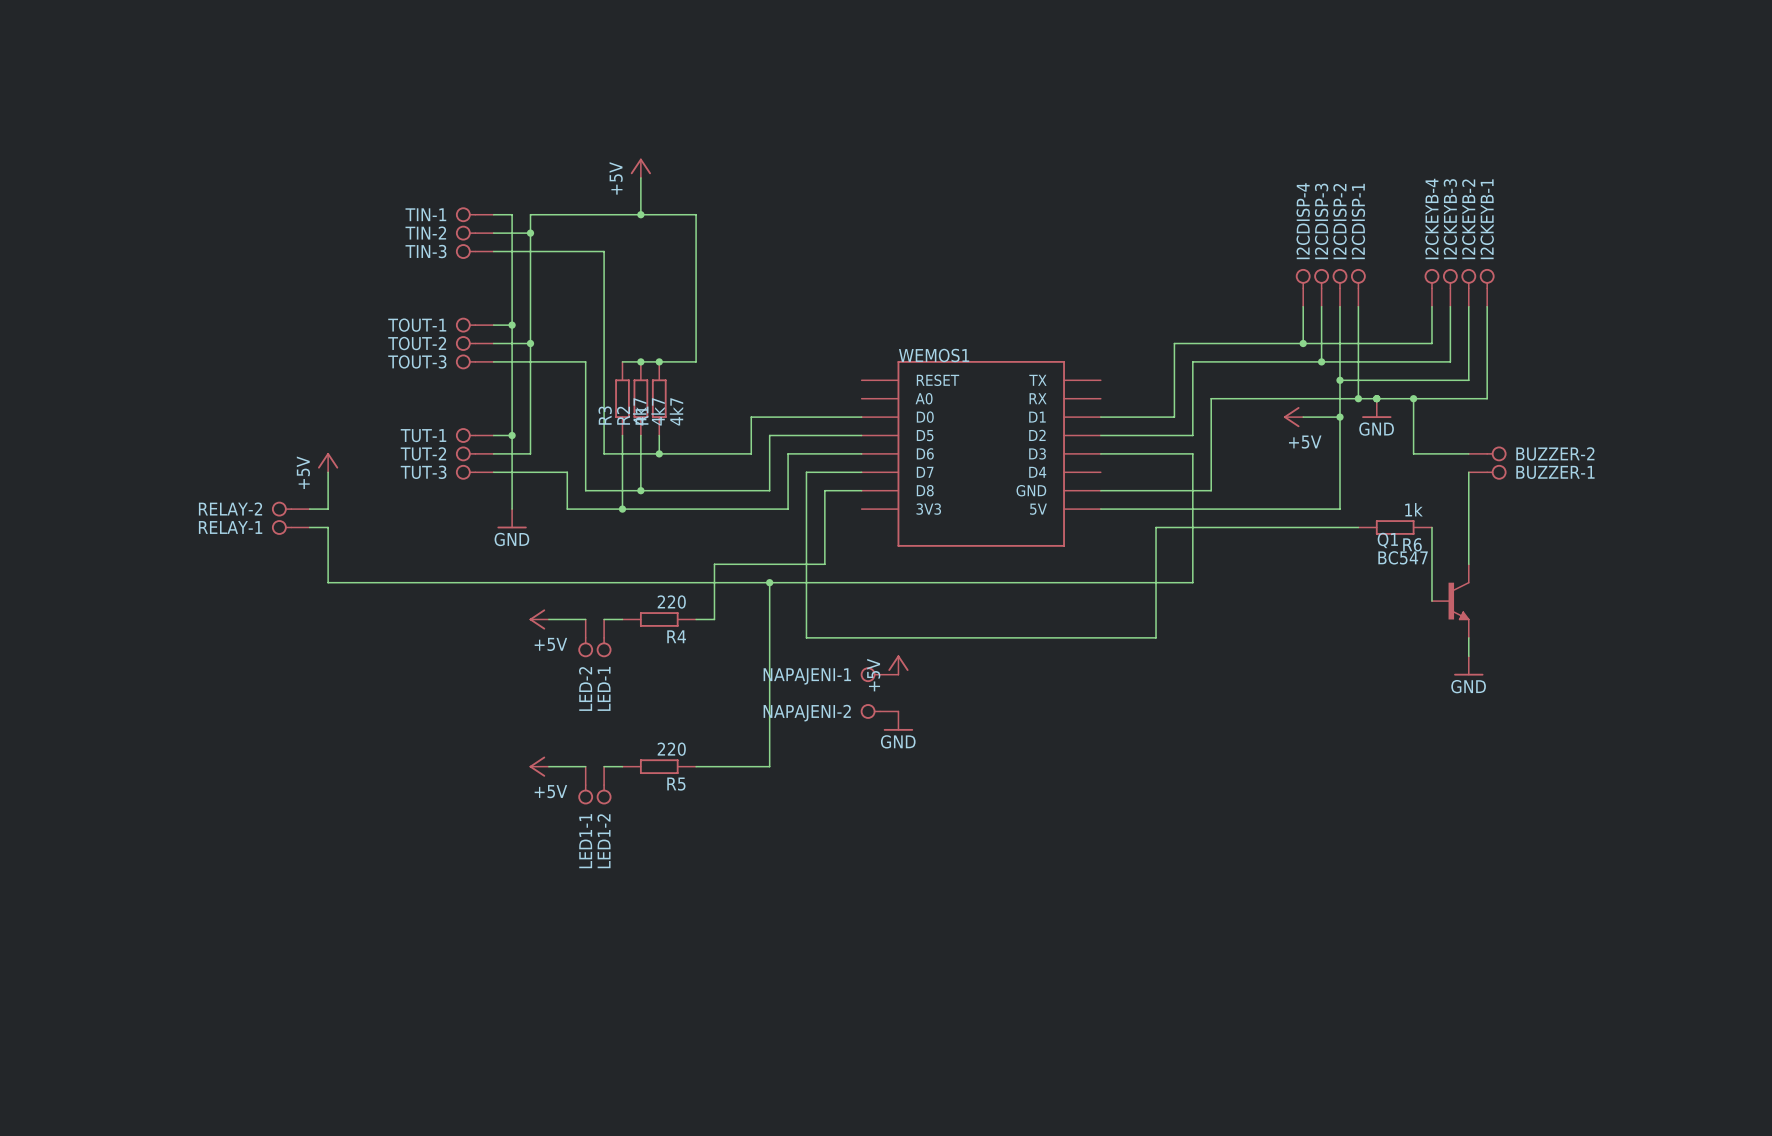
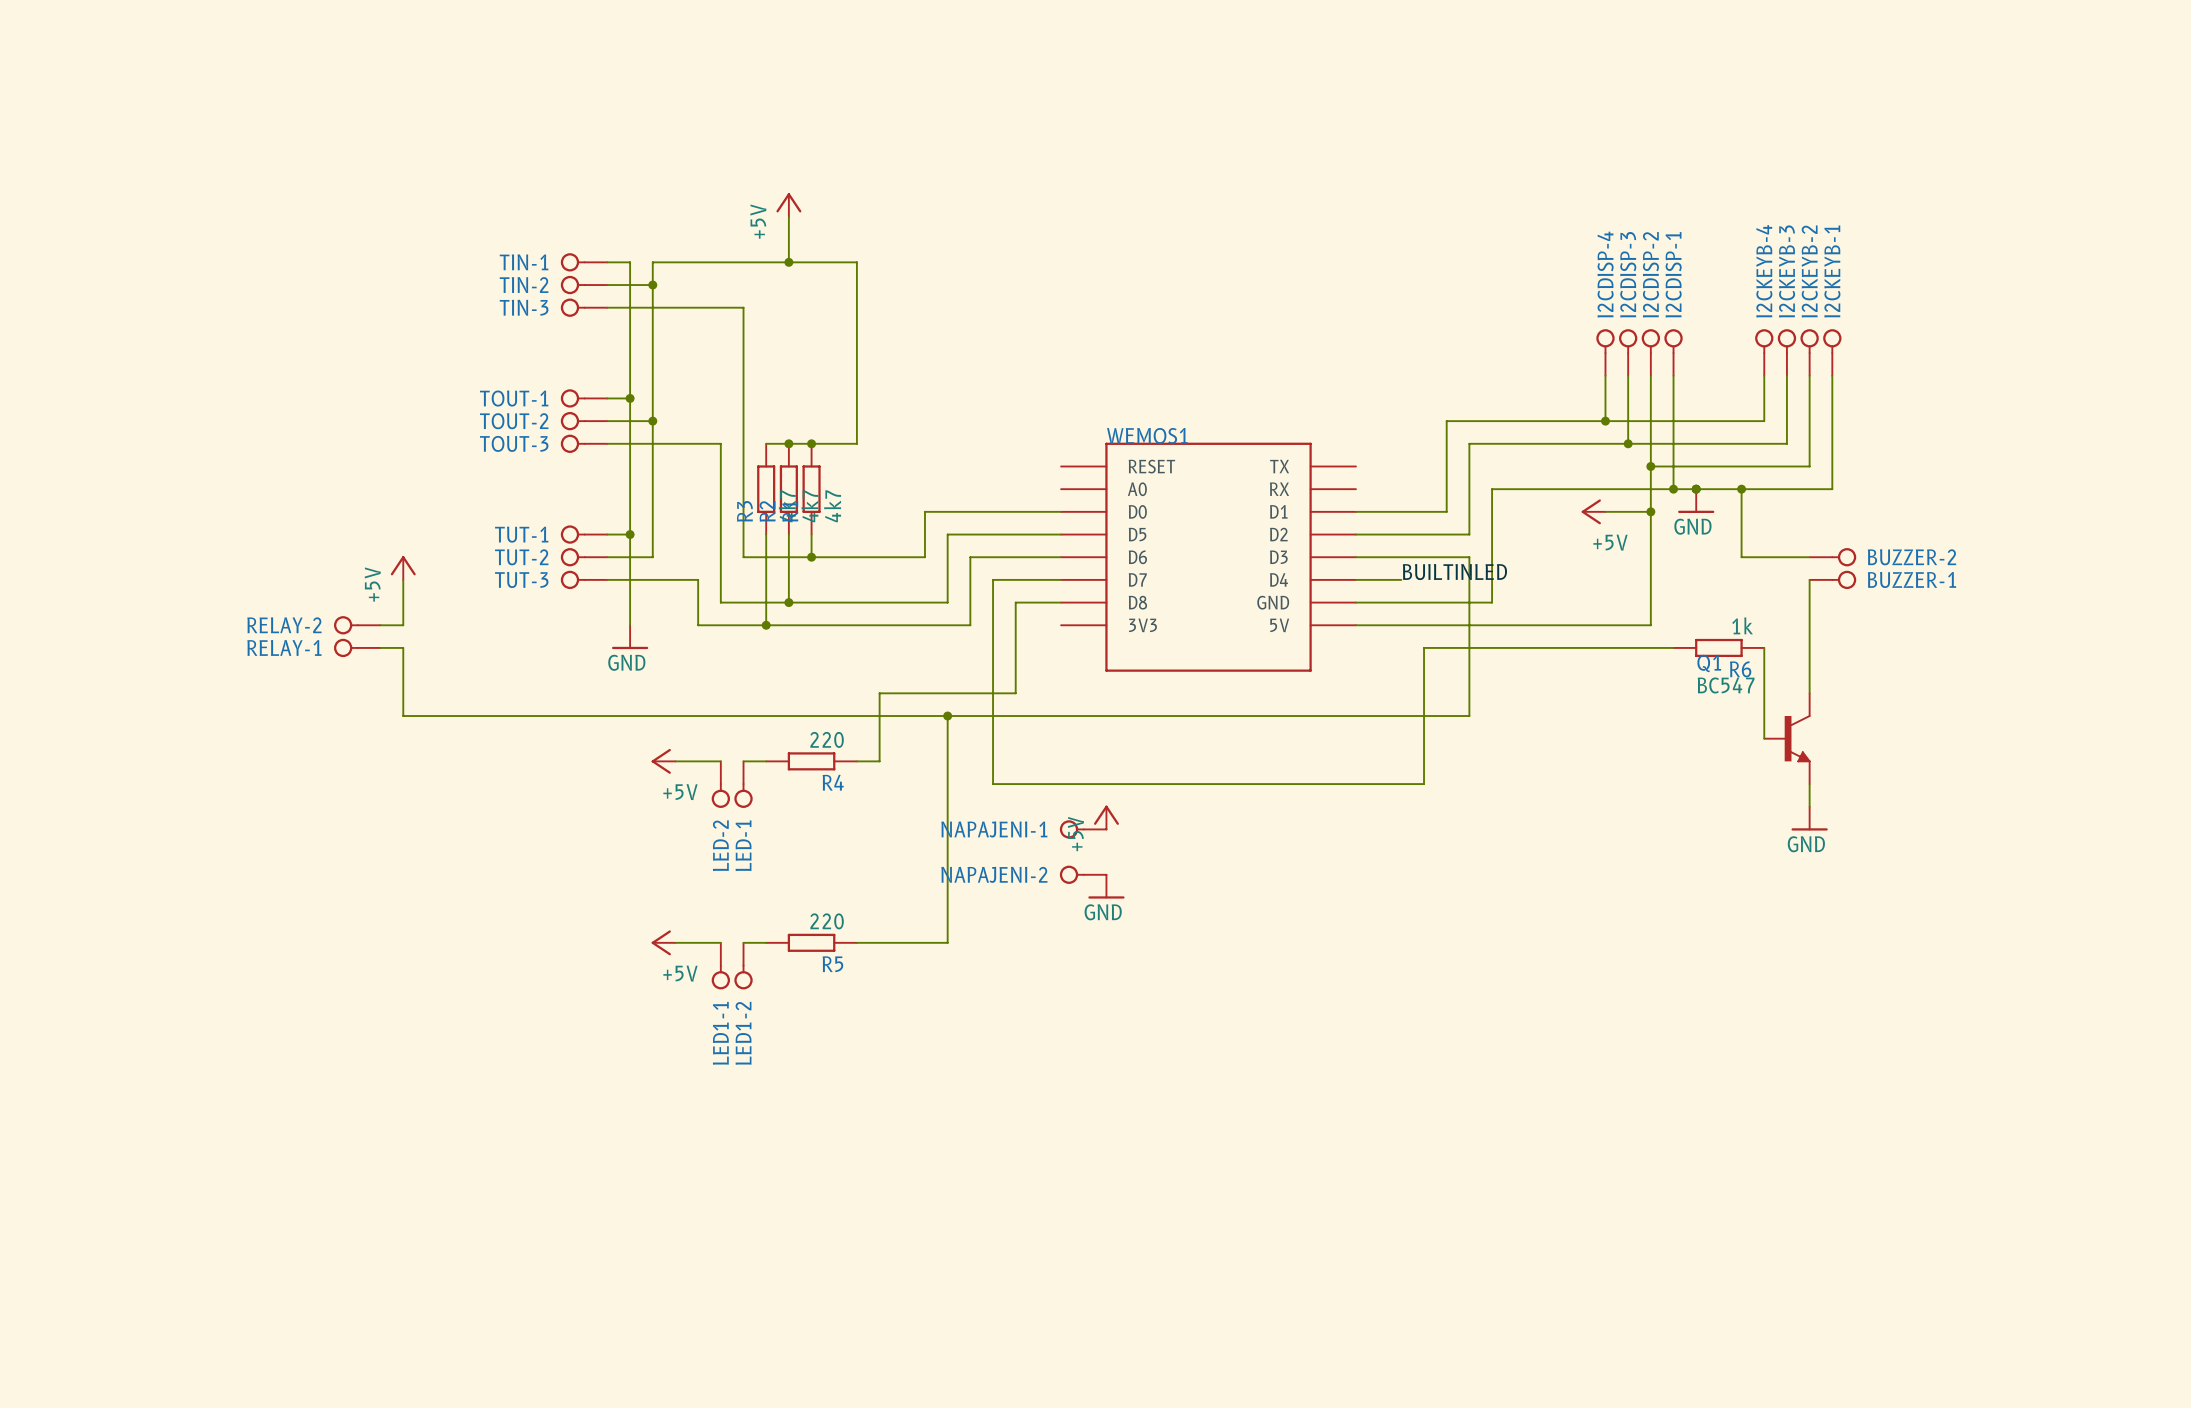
label: none -> BUILTINLED (1454, 572)
wire: none -> (1355, 579) (1401, 579)

